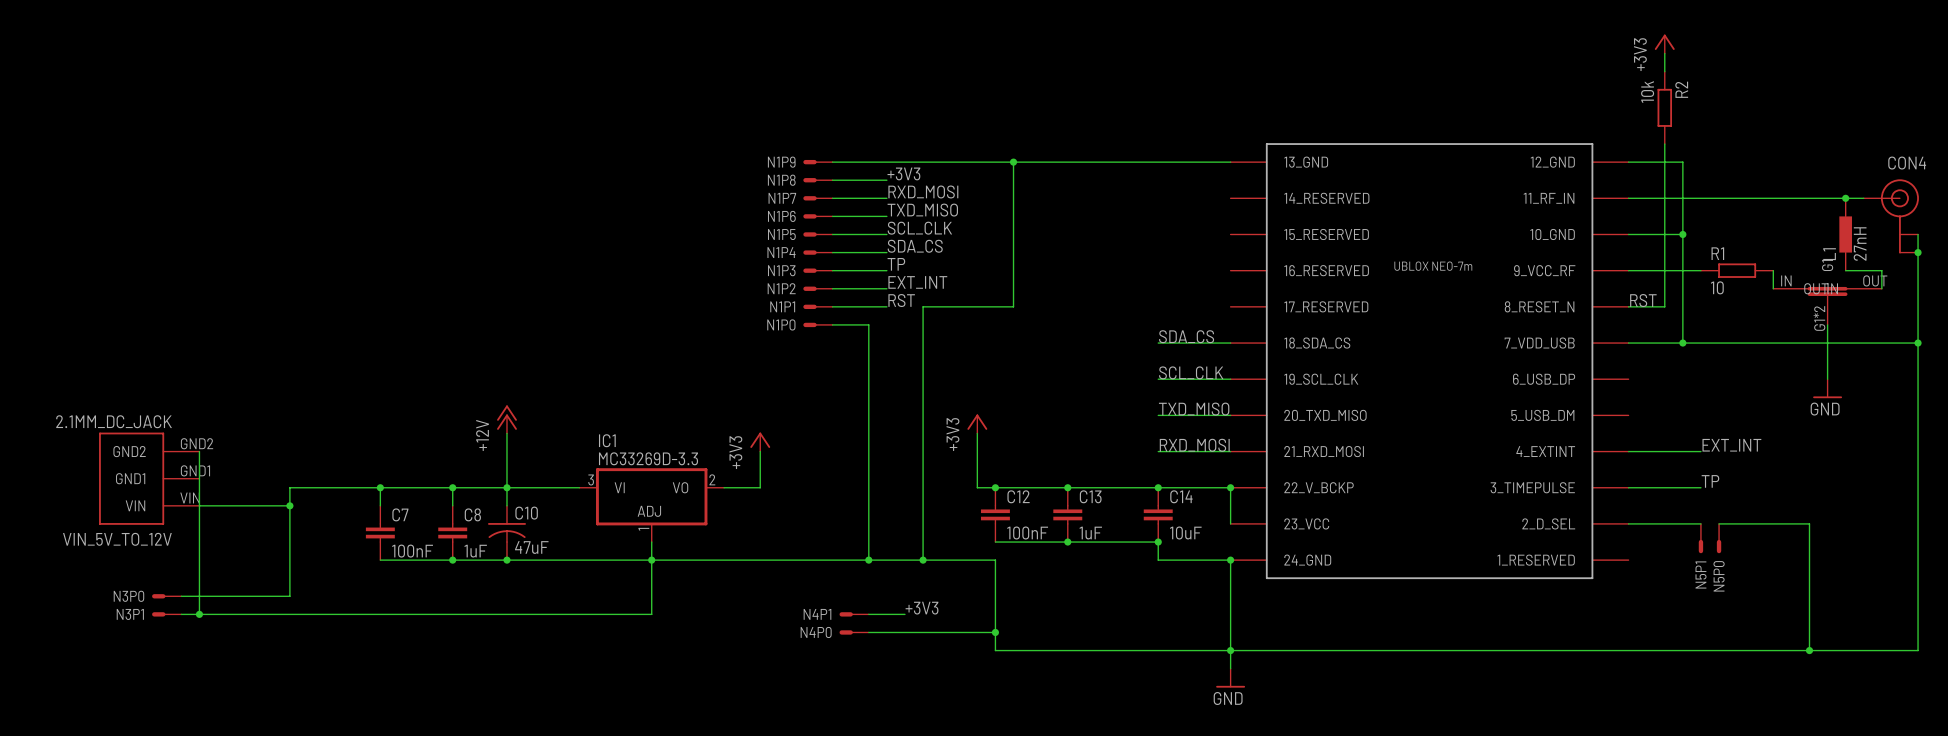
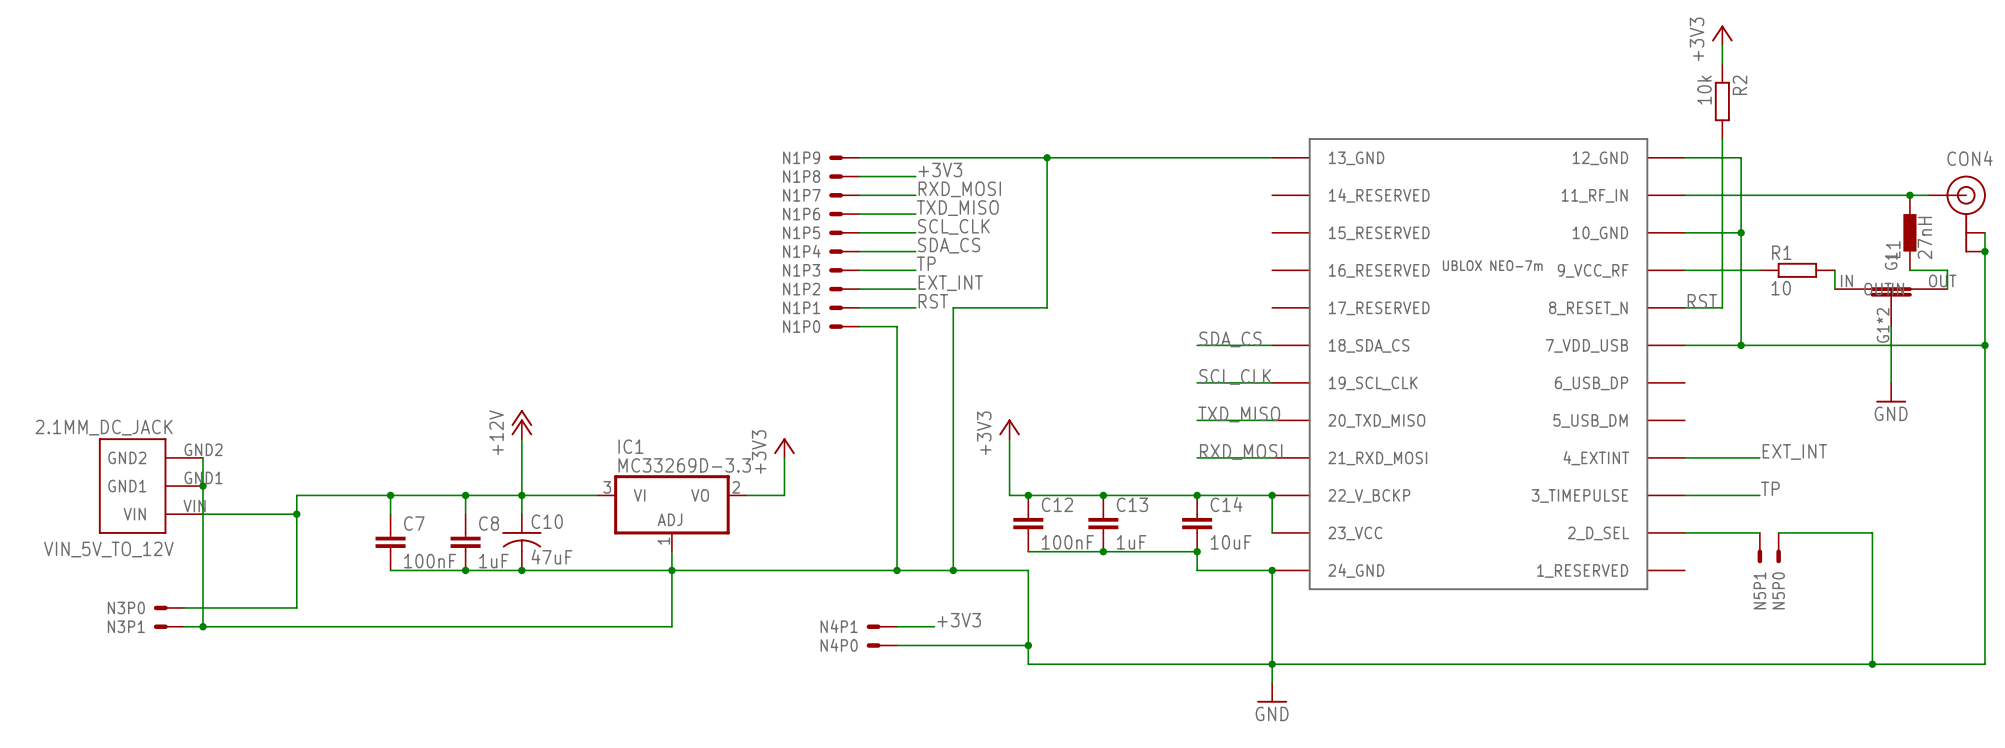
junction: none -> (202, 486)

